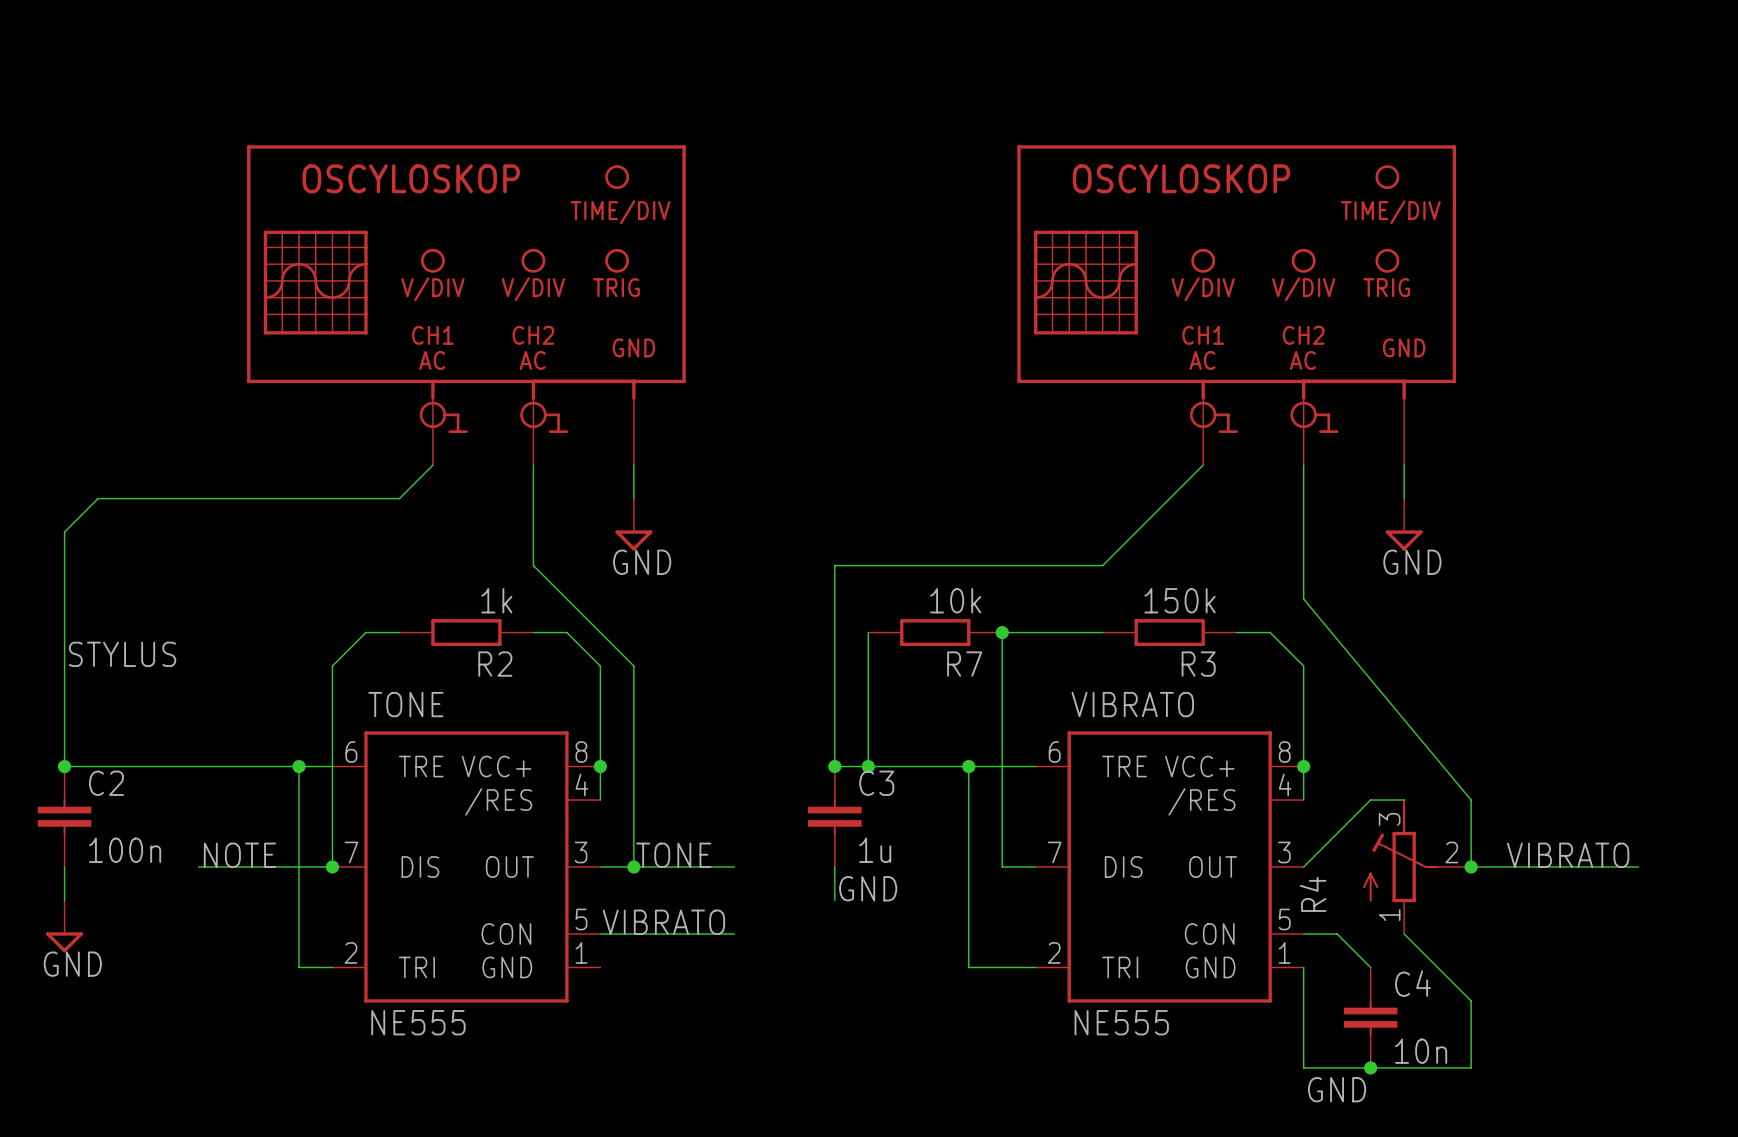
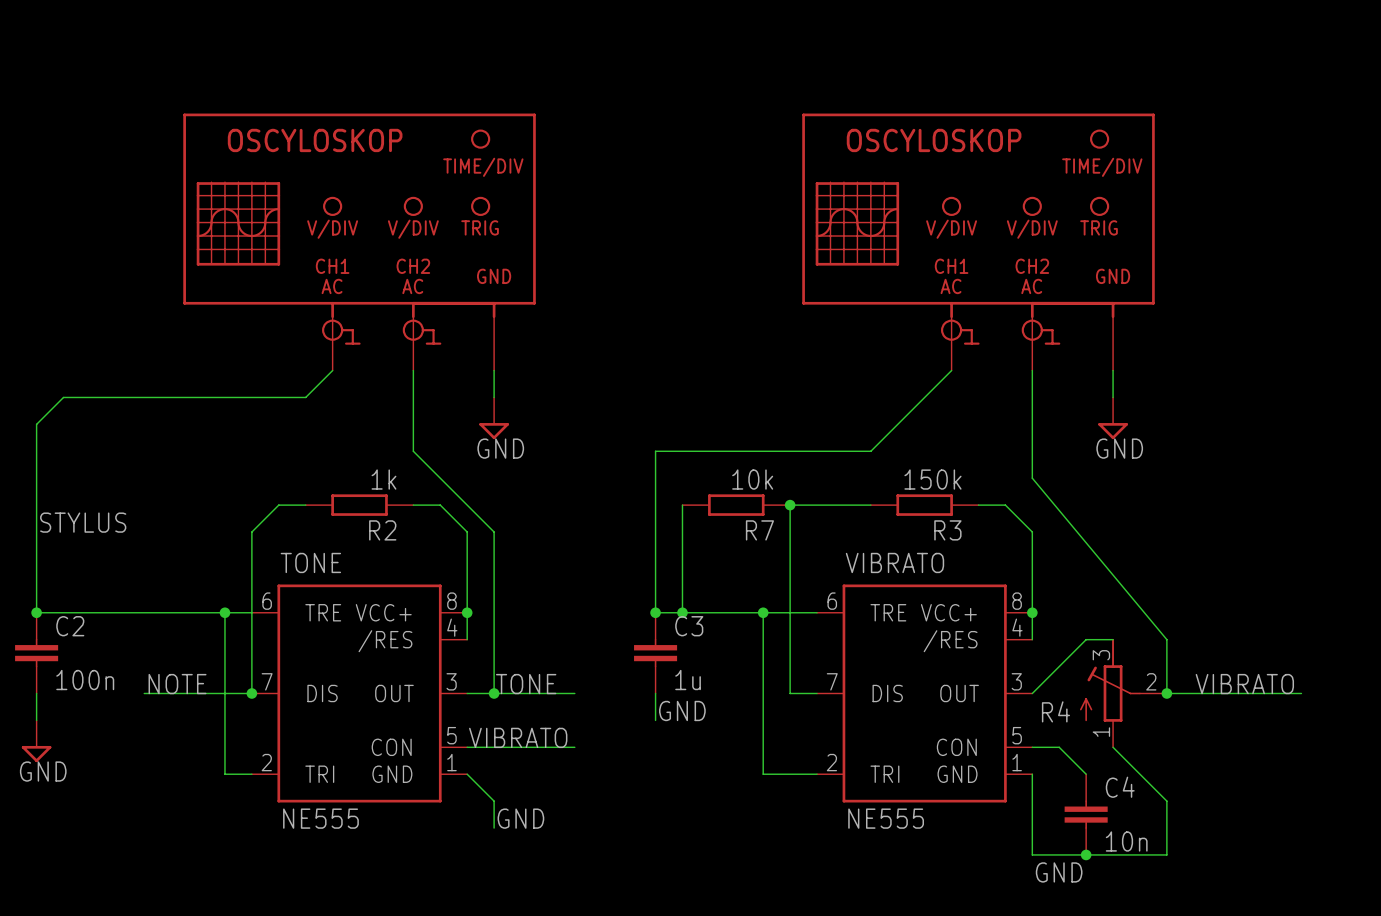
R4 name rotation: 0° (1313, 894) -> 90° clockwise (1055, 711)
wire: none -> (467, 774) (494, 801) (494, 828)
label: none -> GND (520, 818)

